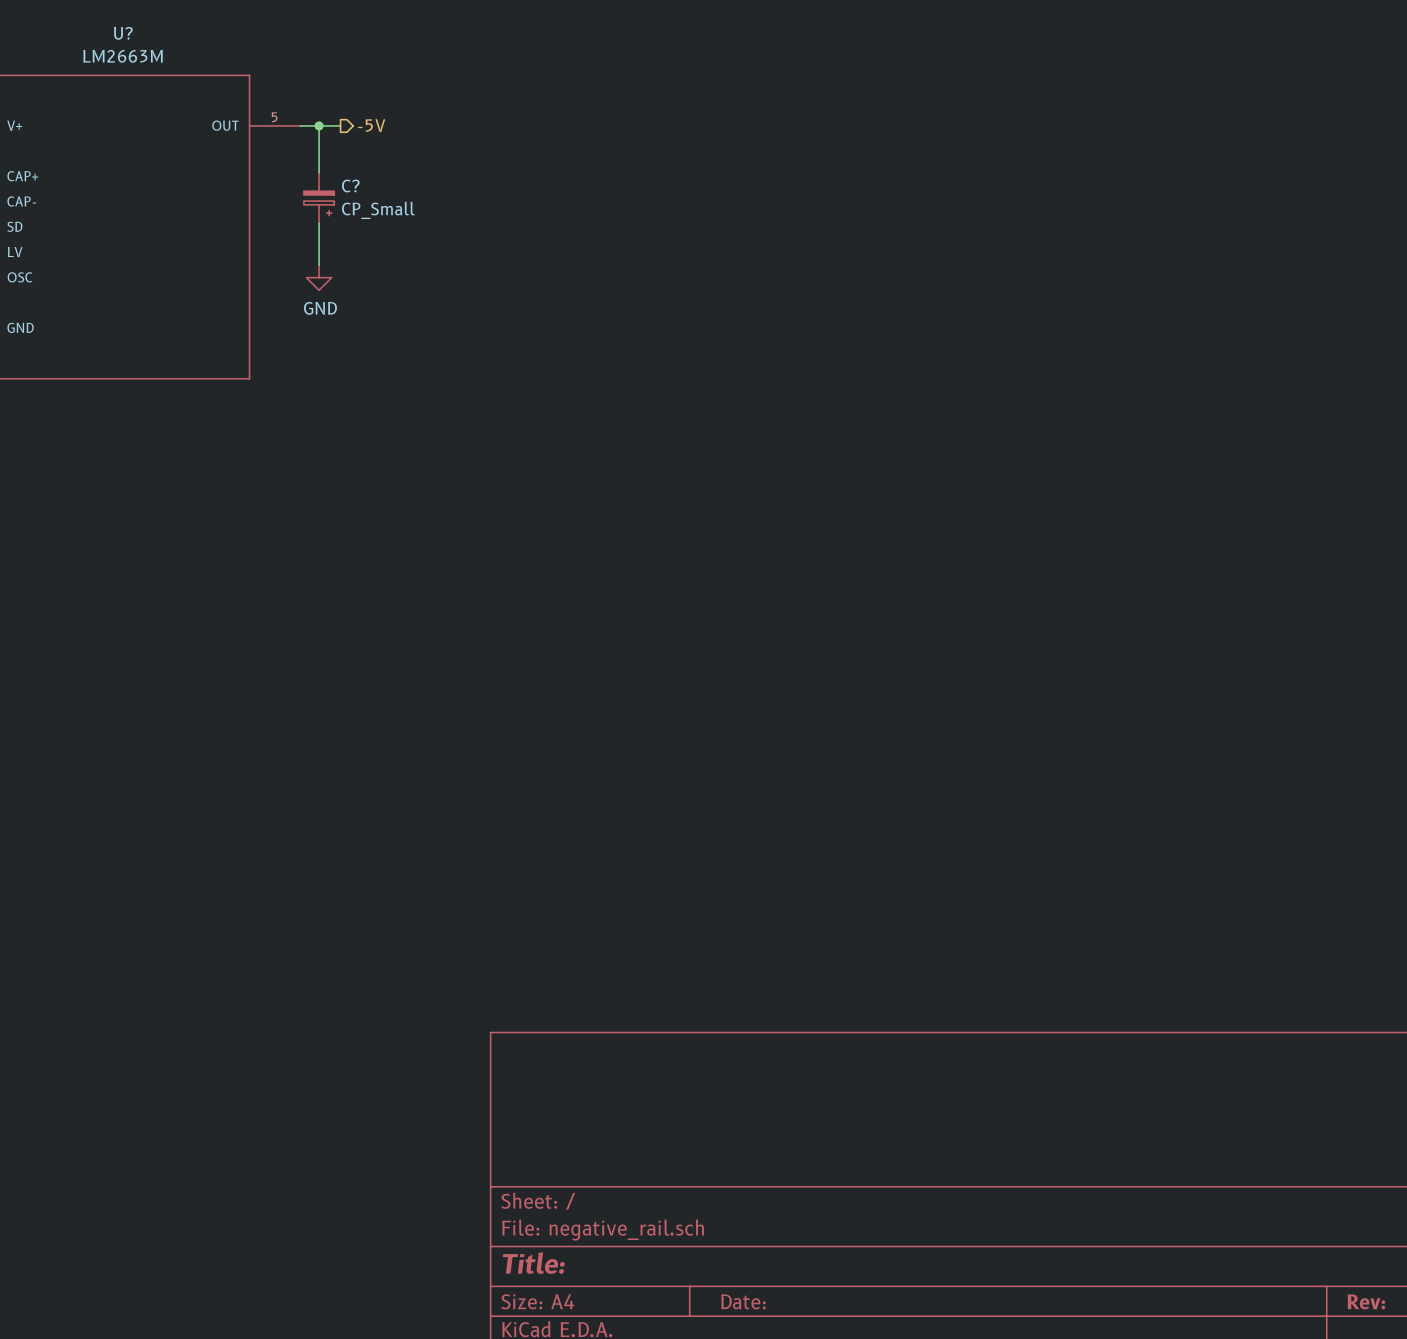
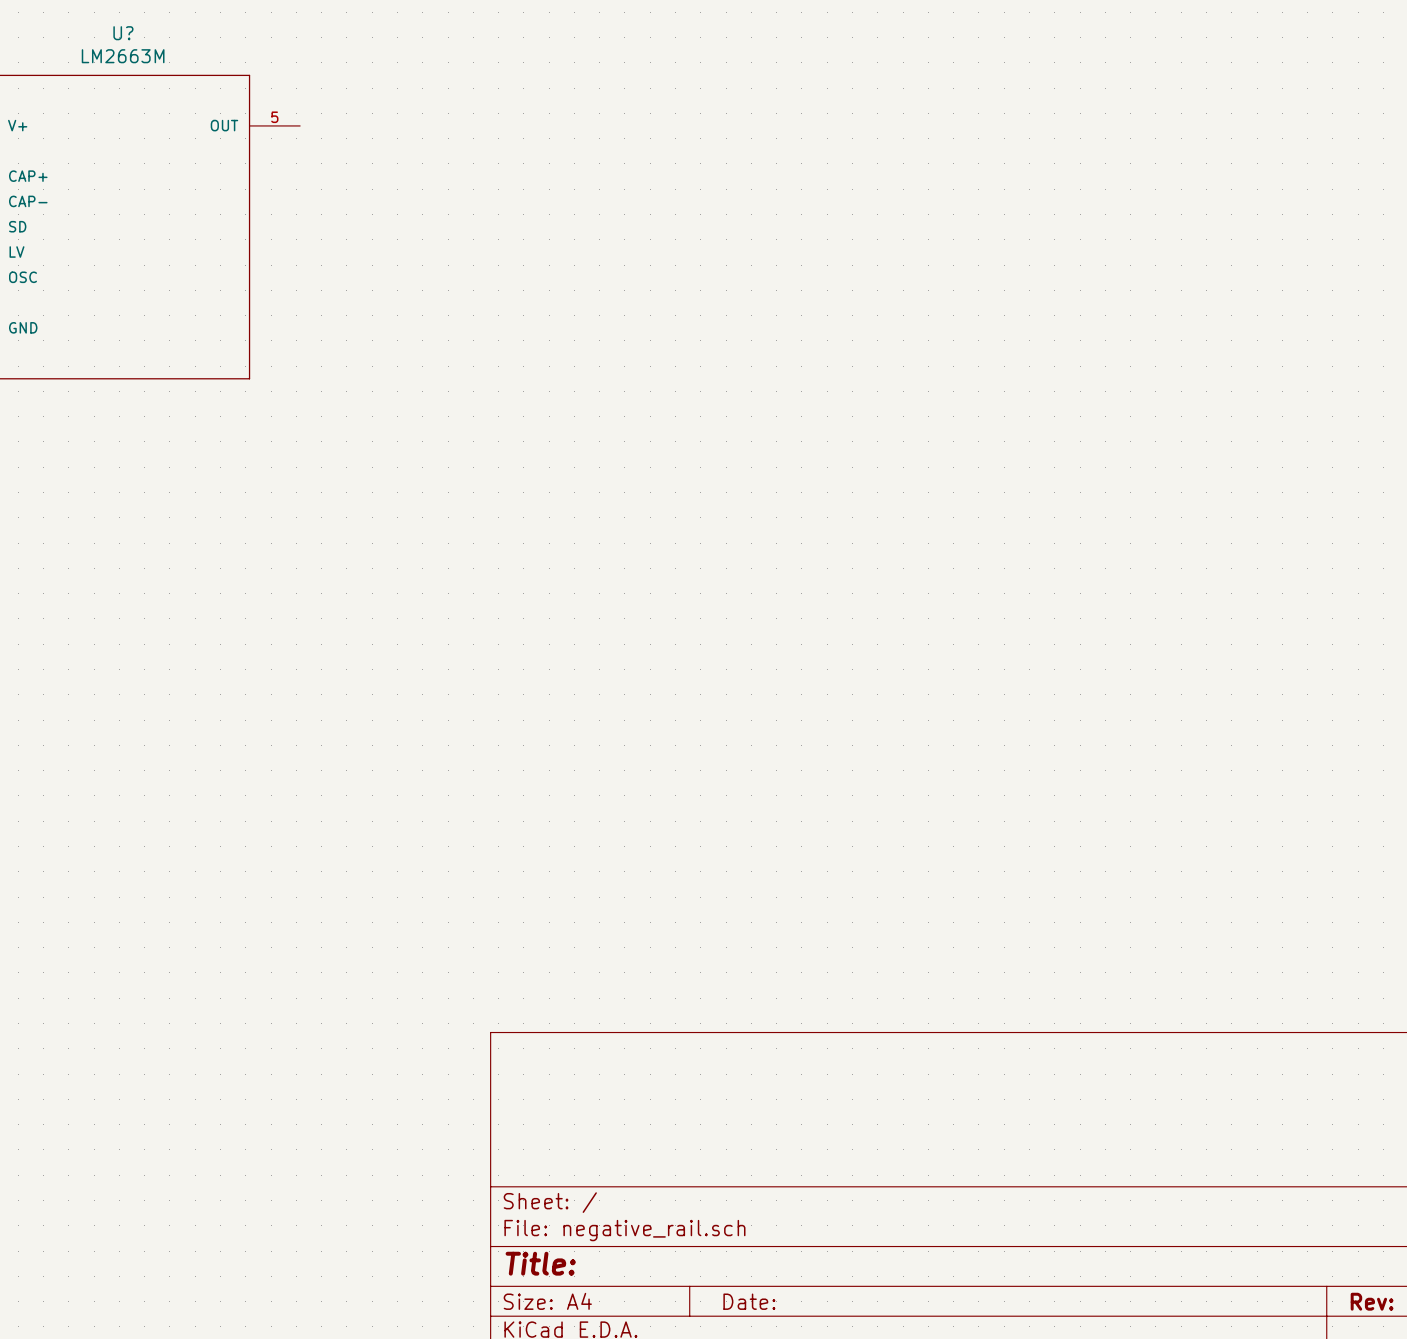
wire: (300, 125) (340, 125) -> none
wire: (319, 125) (319, 172) -> none
junction: (319, 125) -> none
hierarchical label: -5V (371, 125) -> none
C?: CP_Small (319, 198) -> none
wire: (319, 223) (319, 265) -> none
power symbol: GND (319, 277) -> none

